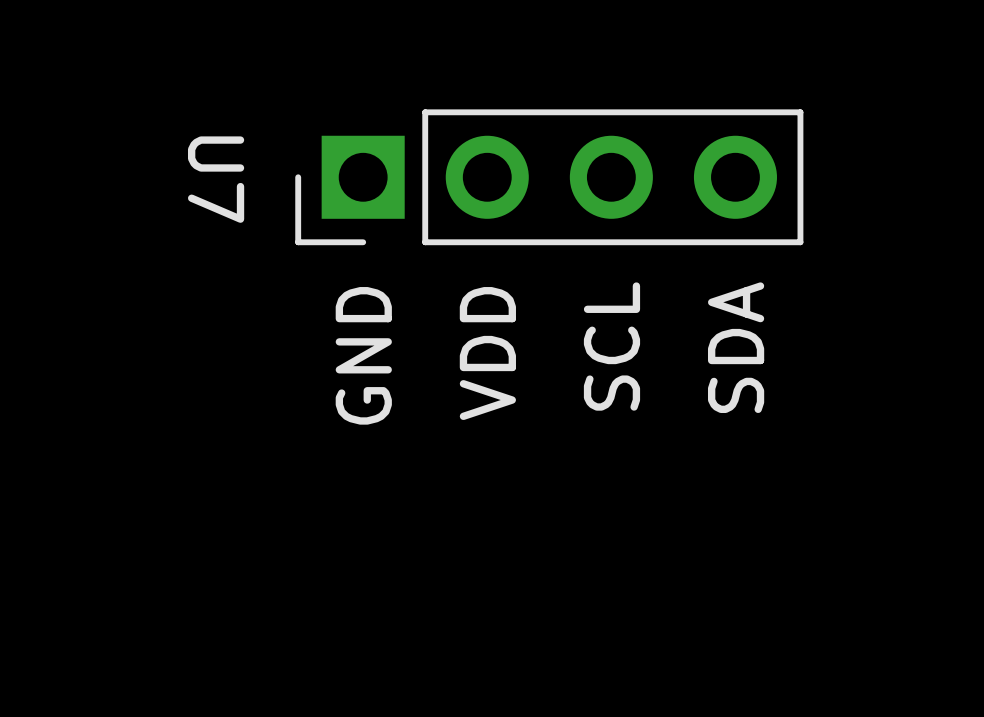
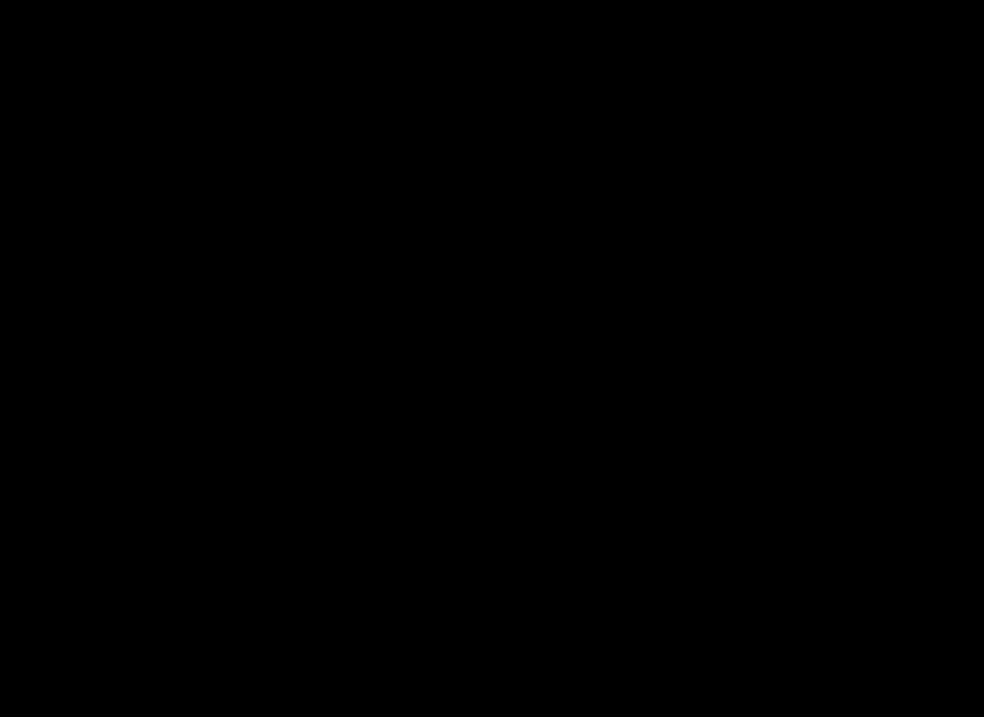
U7: (549, 177) -> none

